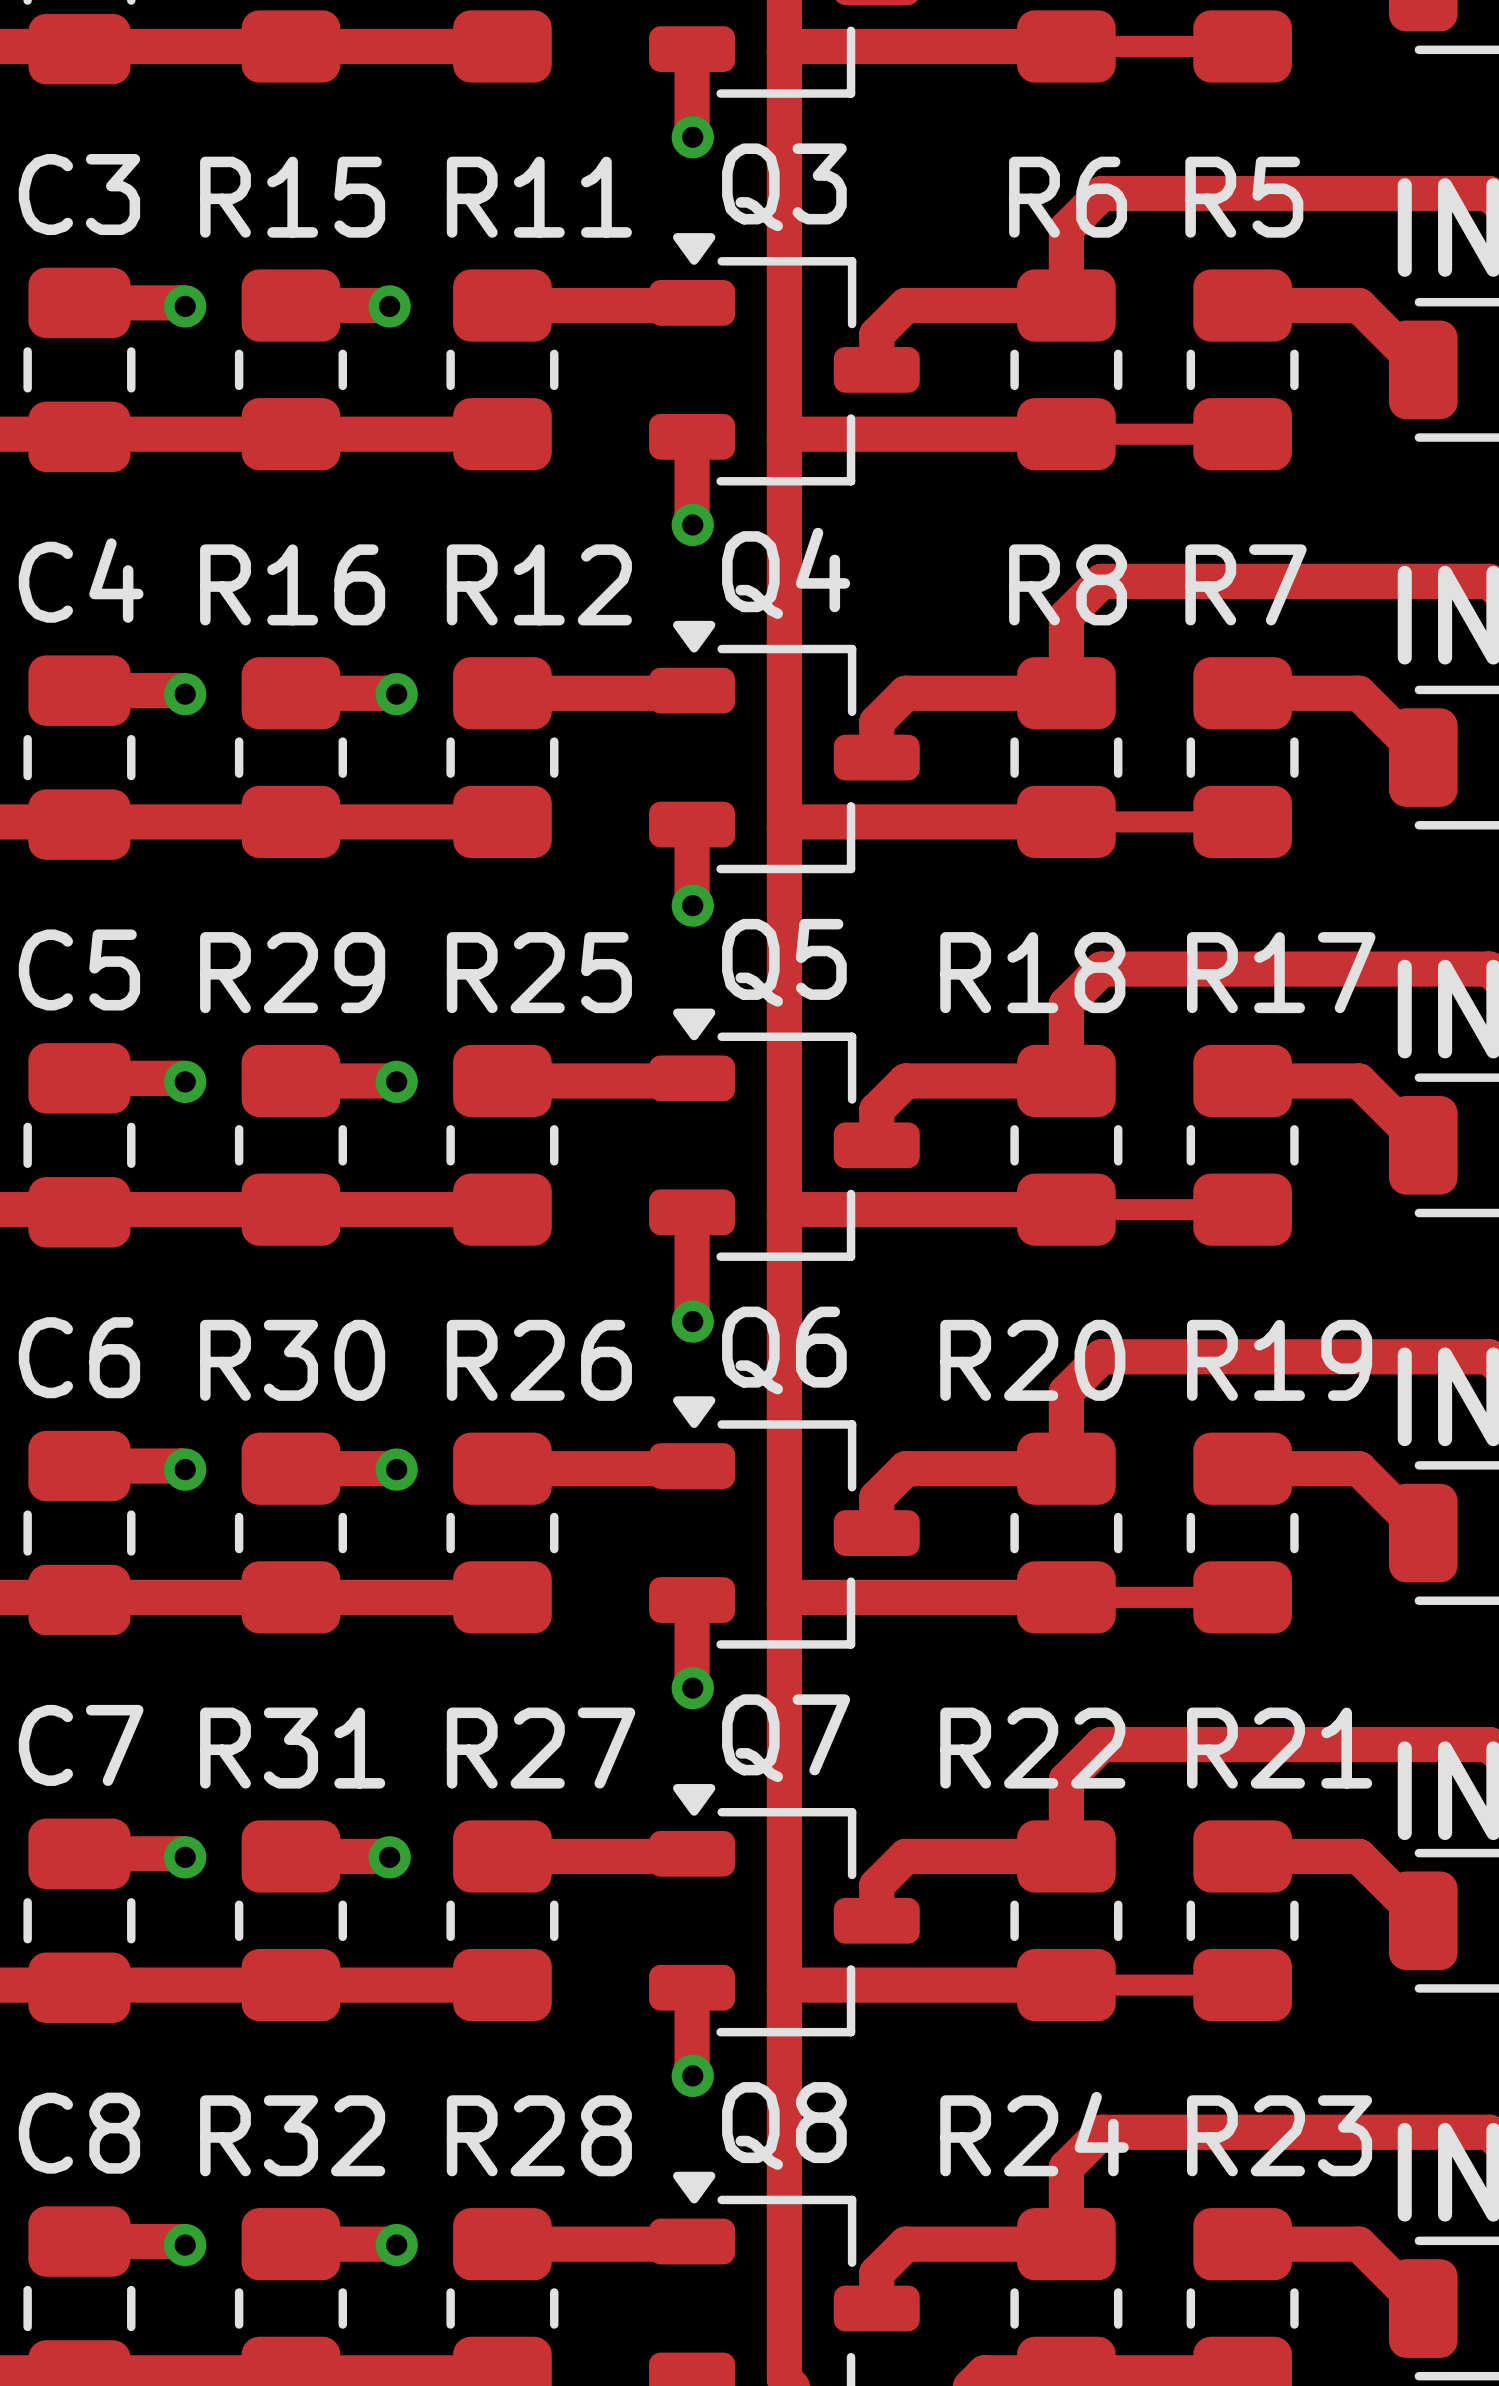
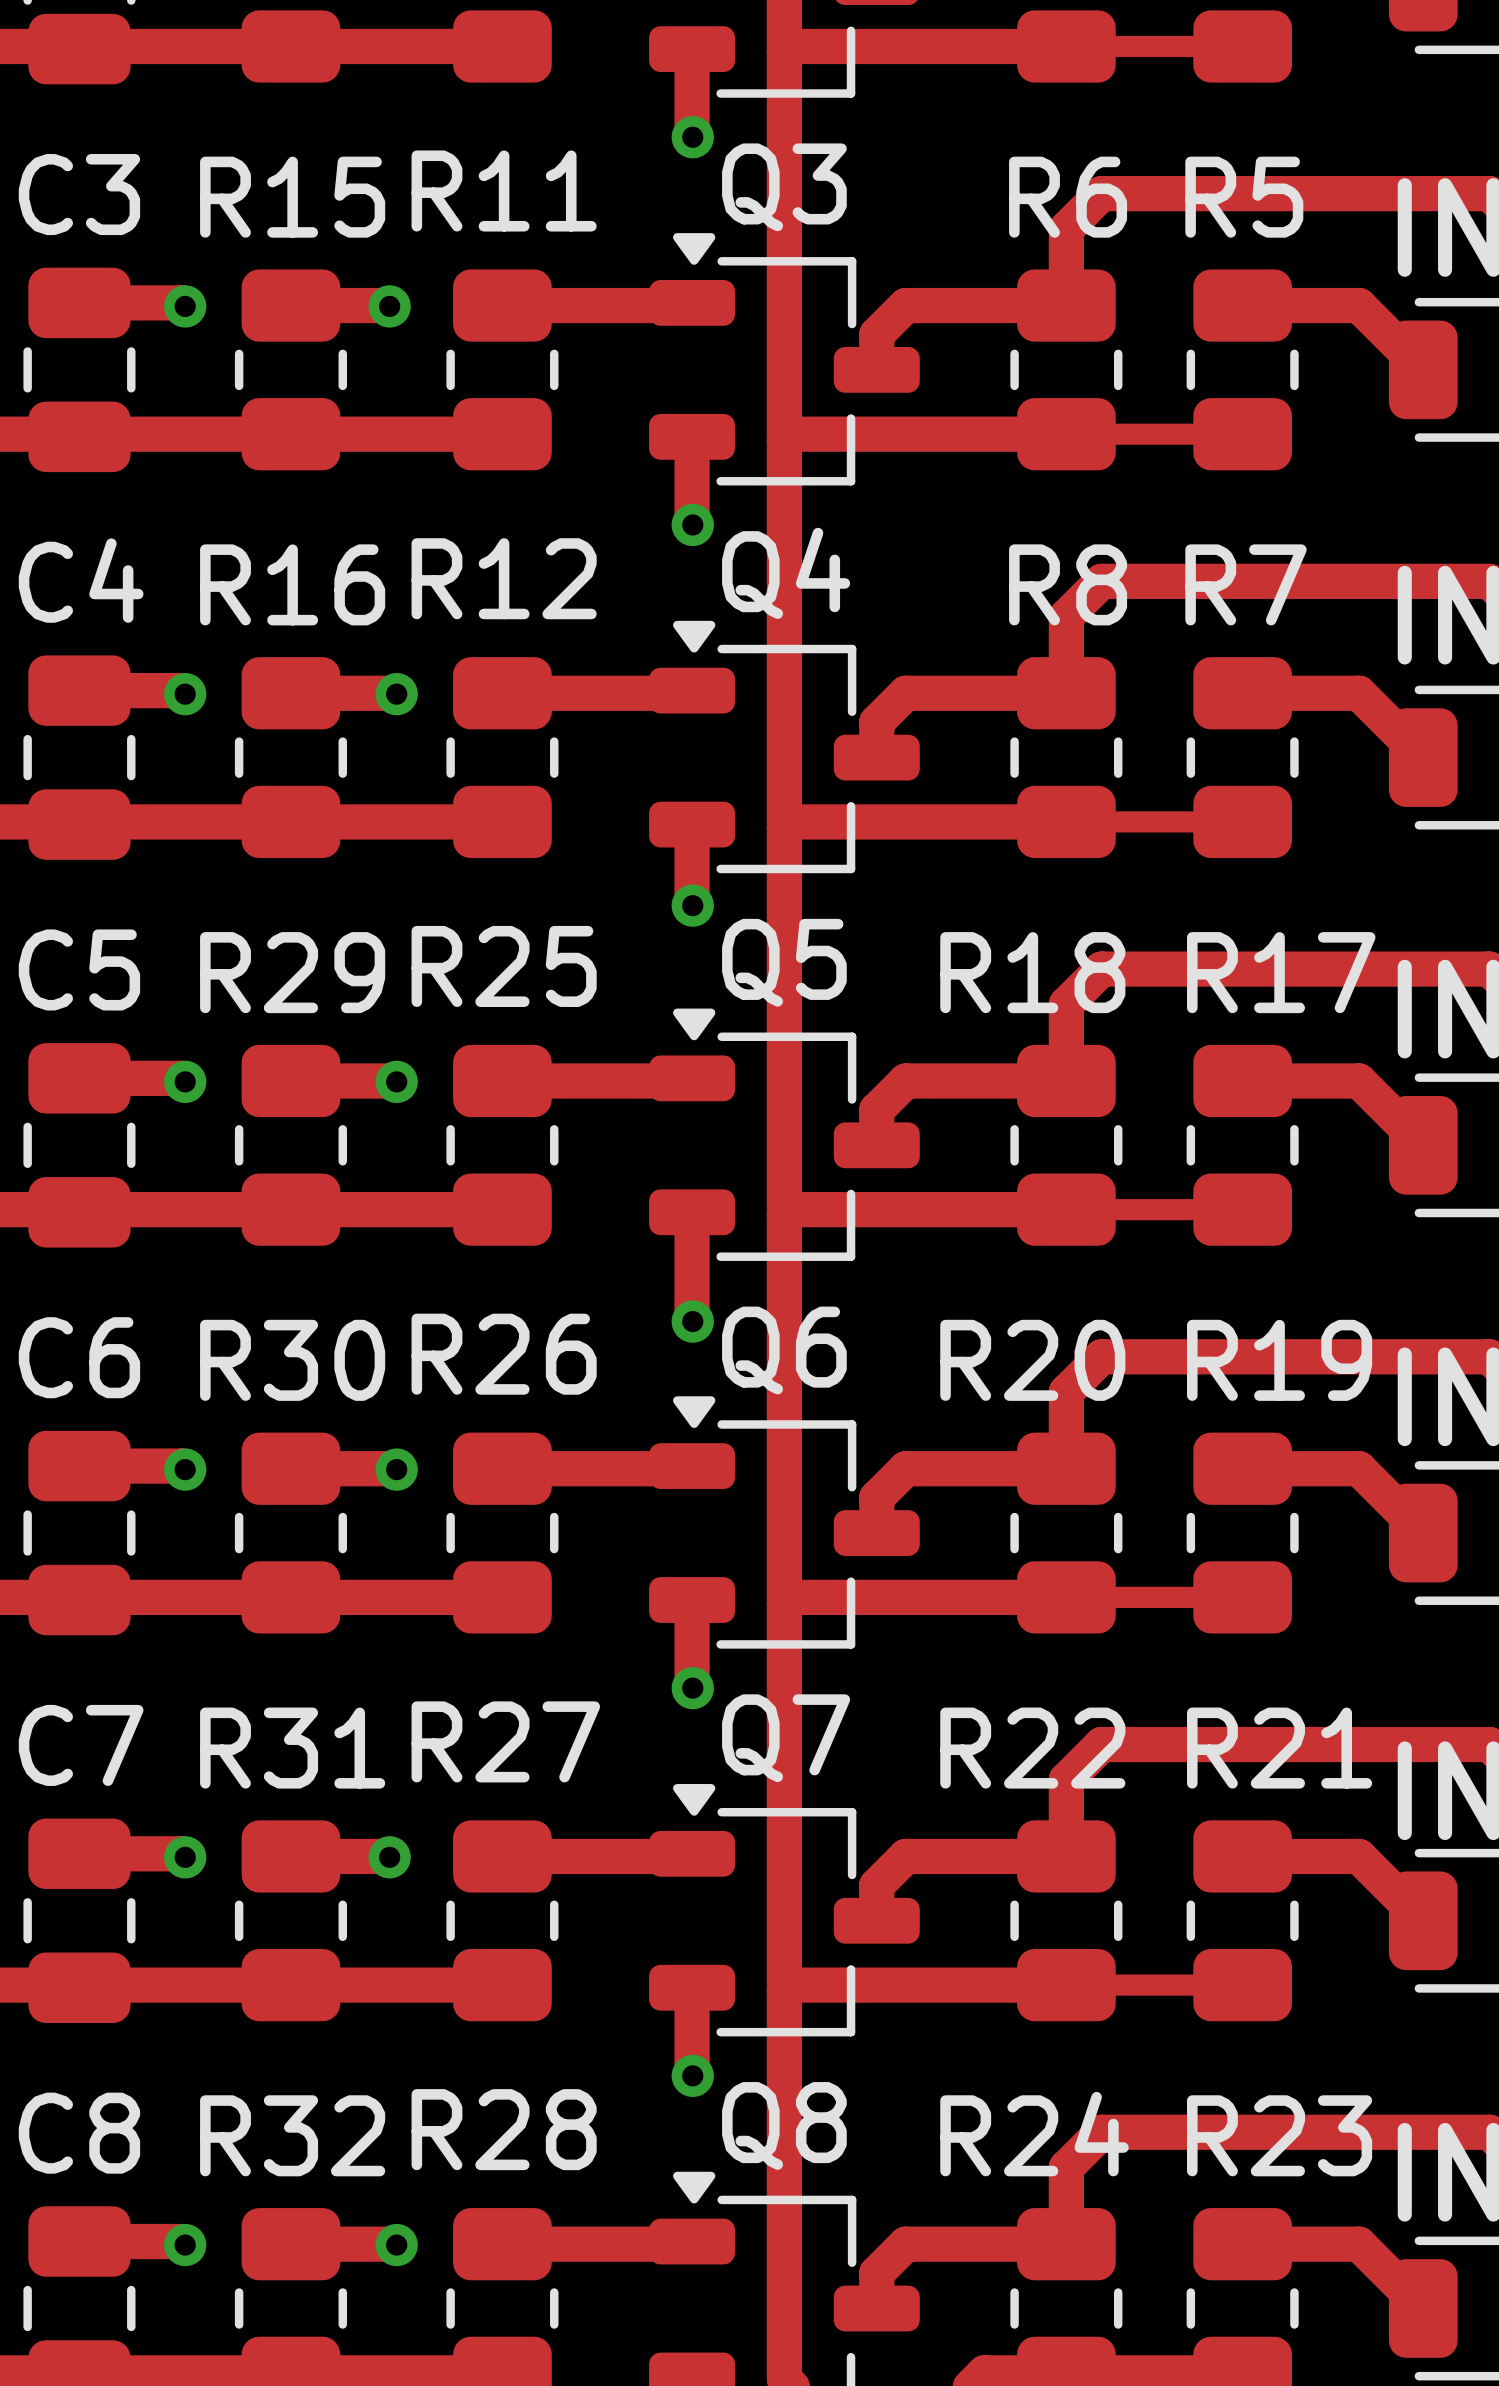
R11 name position: R11 (539, 197) -> R11 (504, 191)
R12 name position: R12 (539, 584) -> R12 (504, 578)
R25 name position: R25 (539, 972) -> R25 (504, 966)
R26 name position: R26 (539, 1360) -> R26 (504, 1354)
R27 name position: R27 (541, 1748) -> R27 (505, 1741)
R28 name position: R28 (539, 2135) -> R28 (504, 2129)

